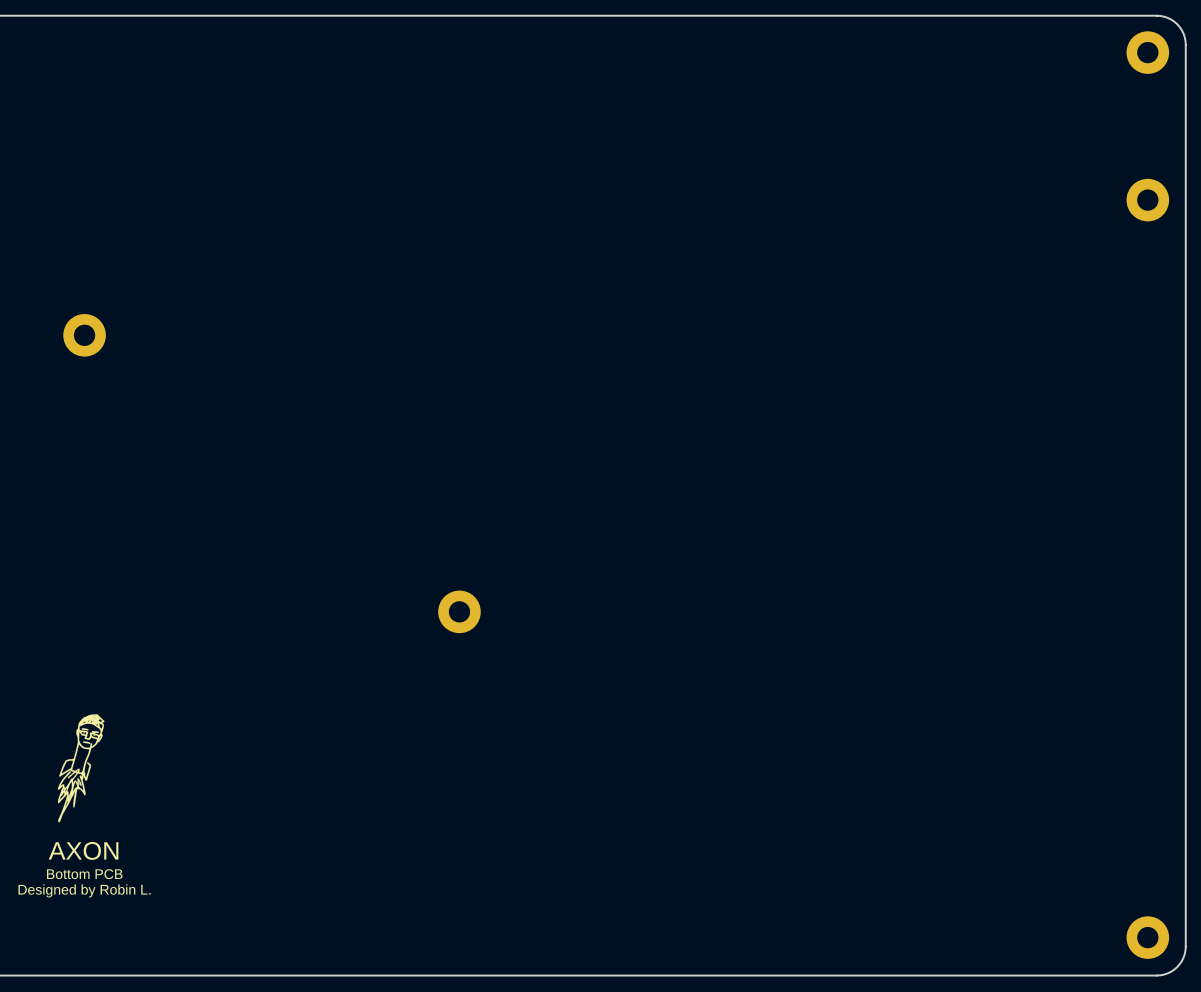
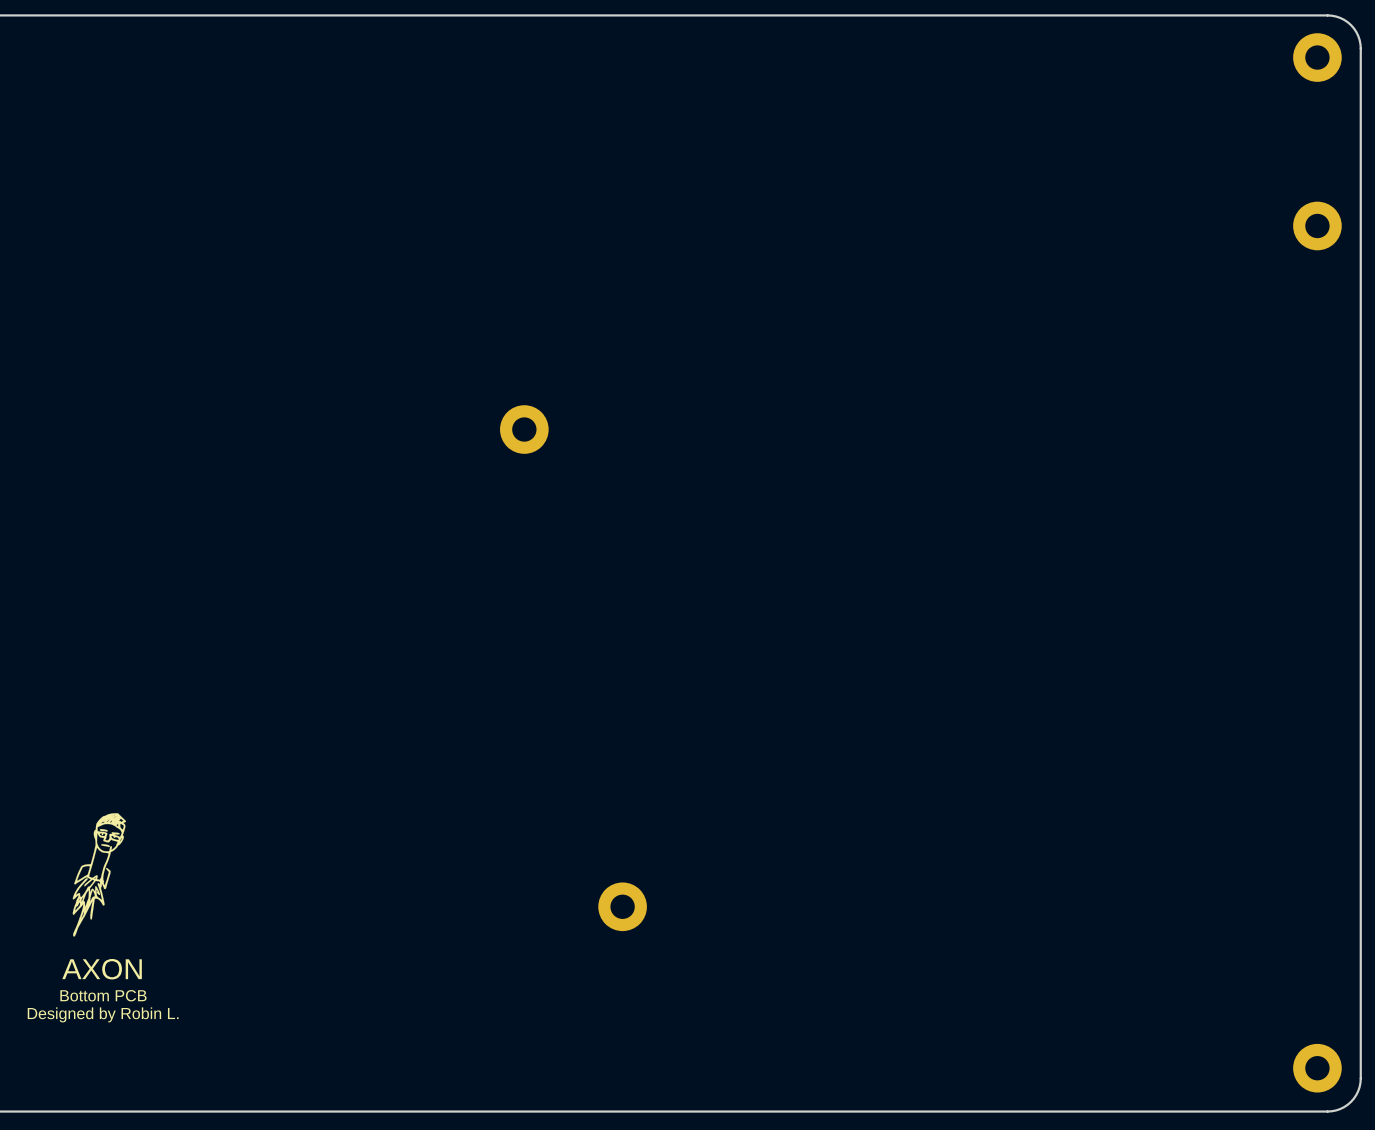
part: (84, 335) -> none
part: none -> (524, 429)
part: (459, 611) -> none
part: none -> (622, 906)

